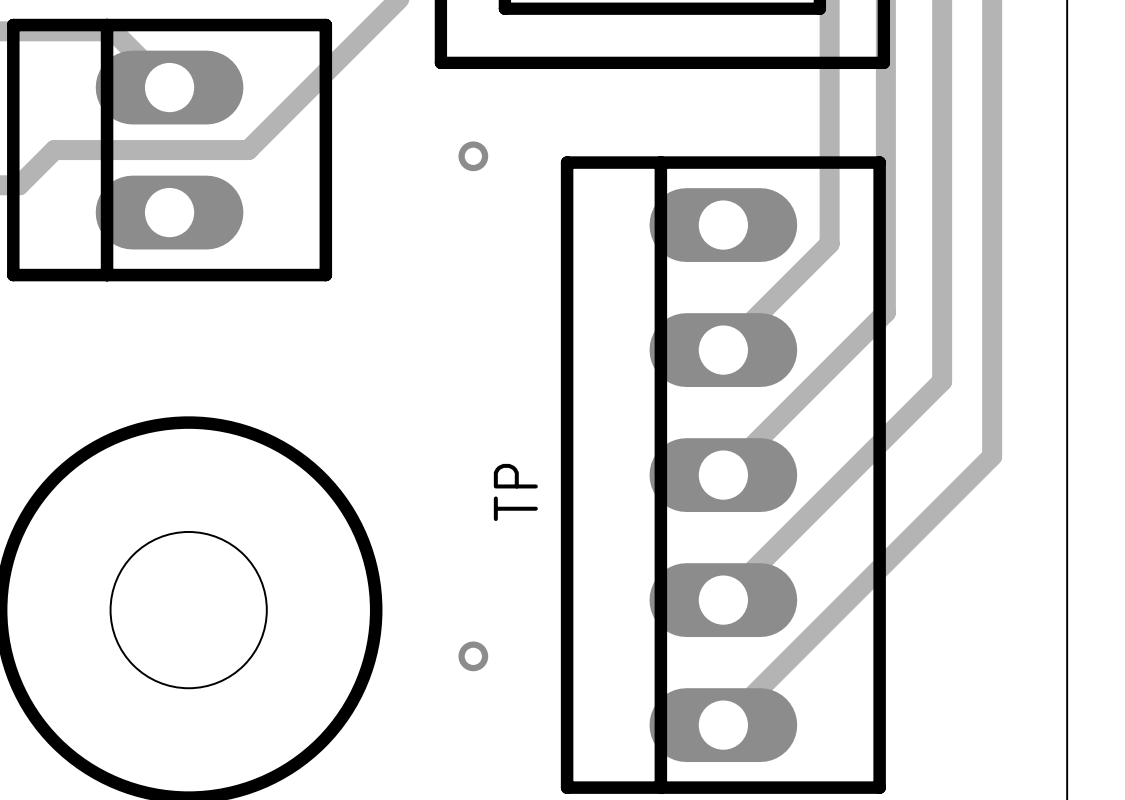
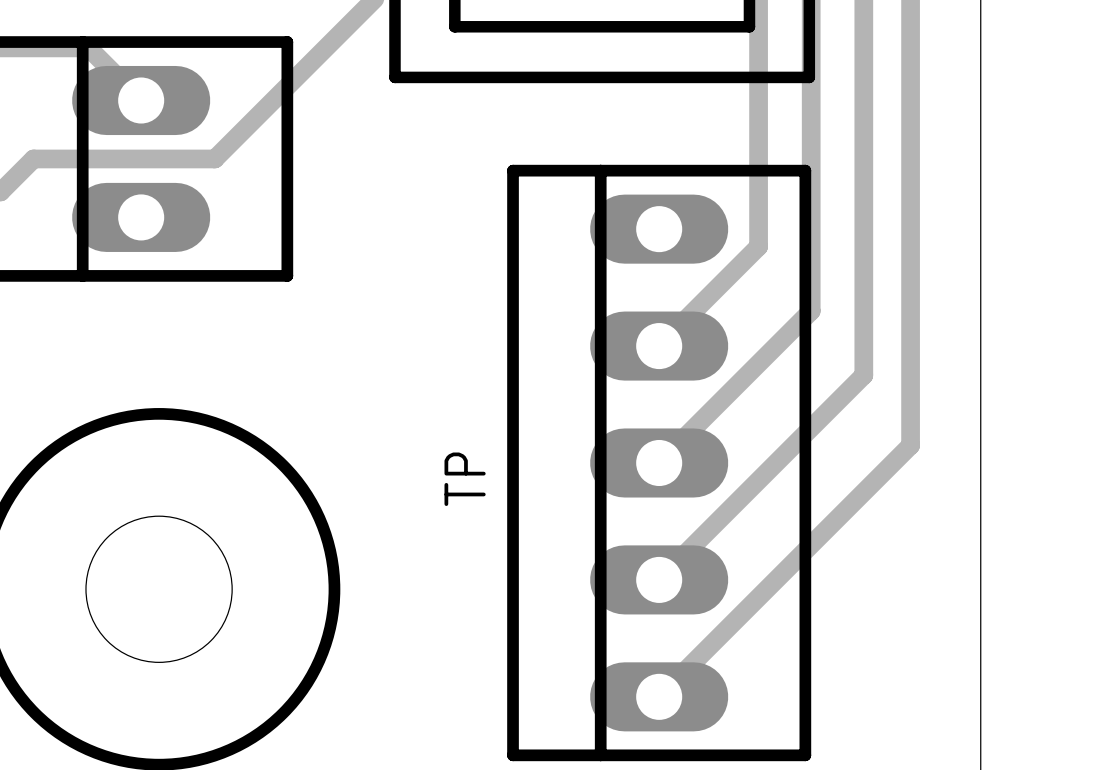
via: (473, 156) -> none
via: (473, 656) -> none

